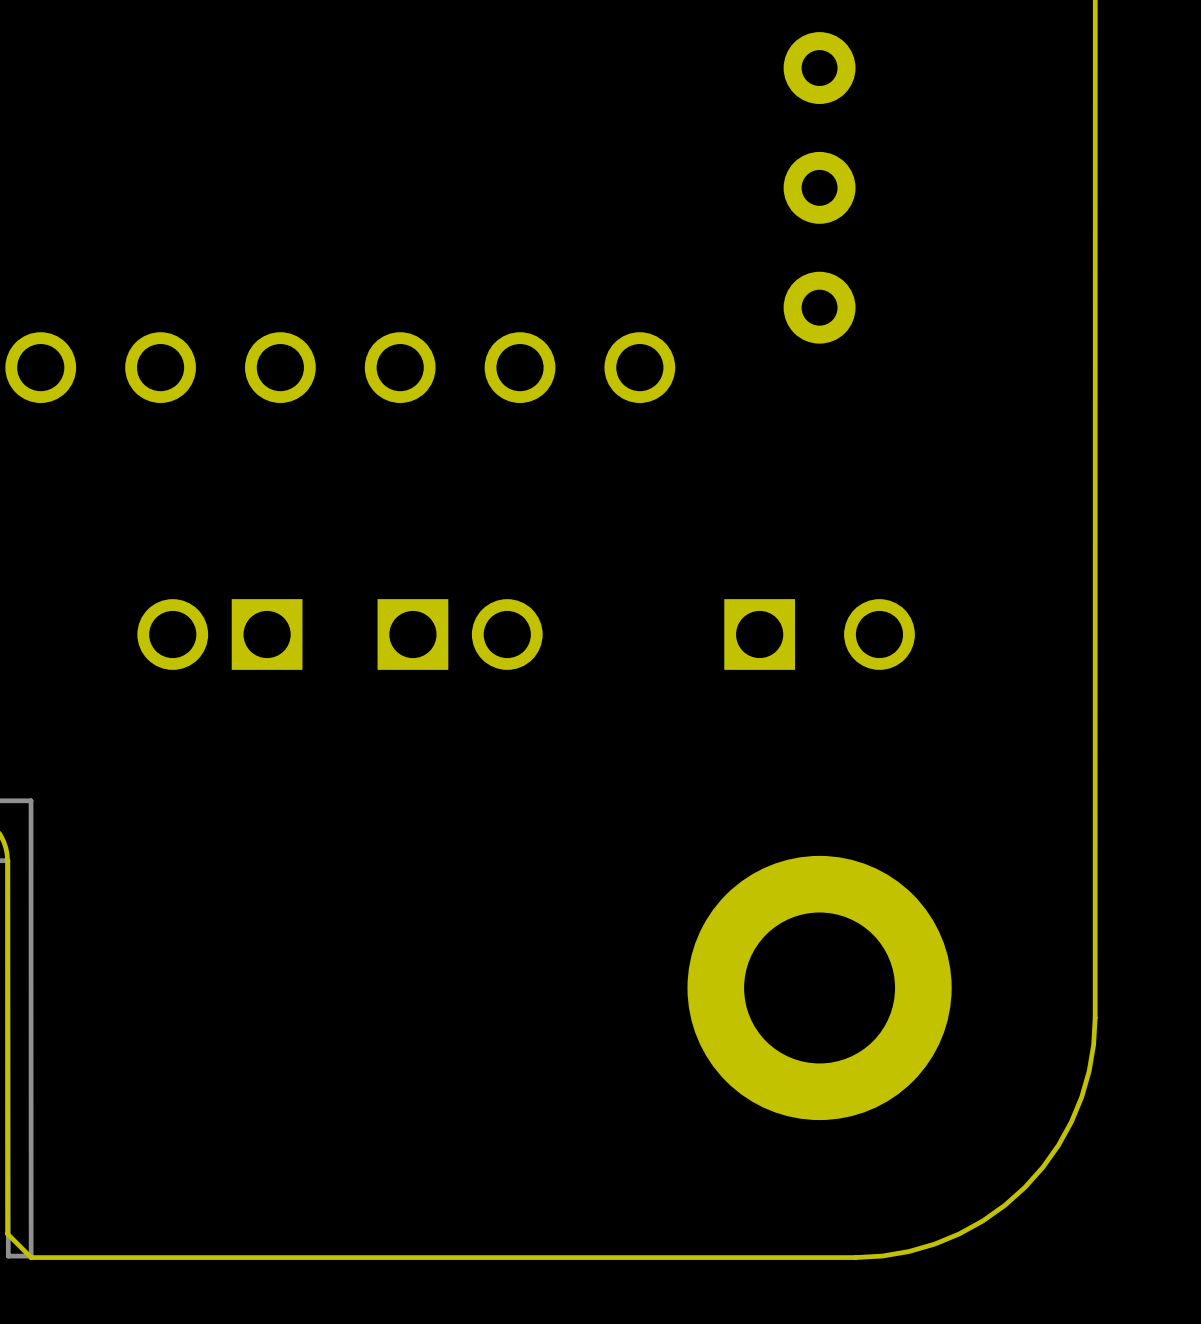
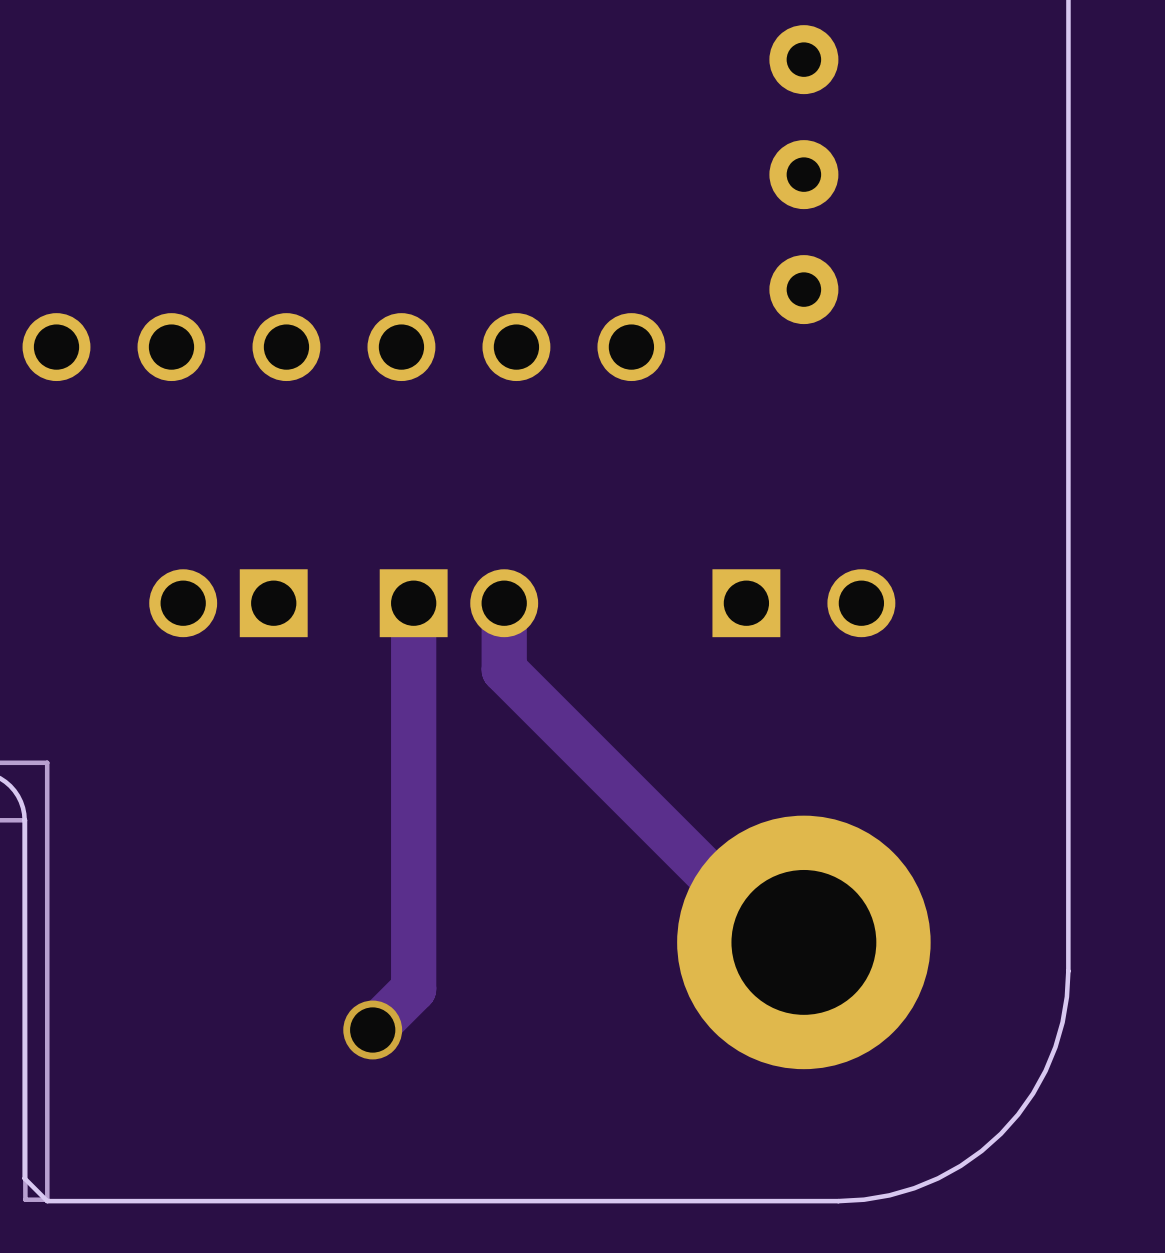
track: none -> (413, 603) (413, 989) (372, 1030)
track: none -> (504, 603) (504, 669) (776, 942)
via: none -> (372, 1030)

